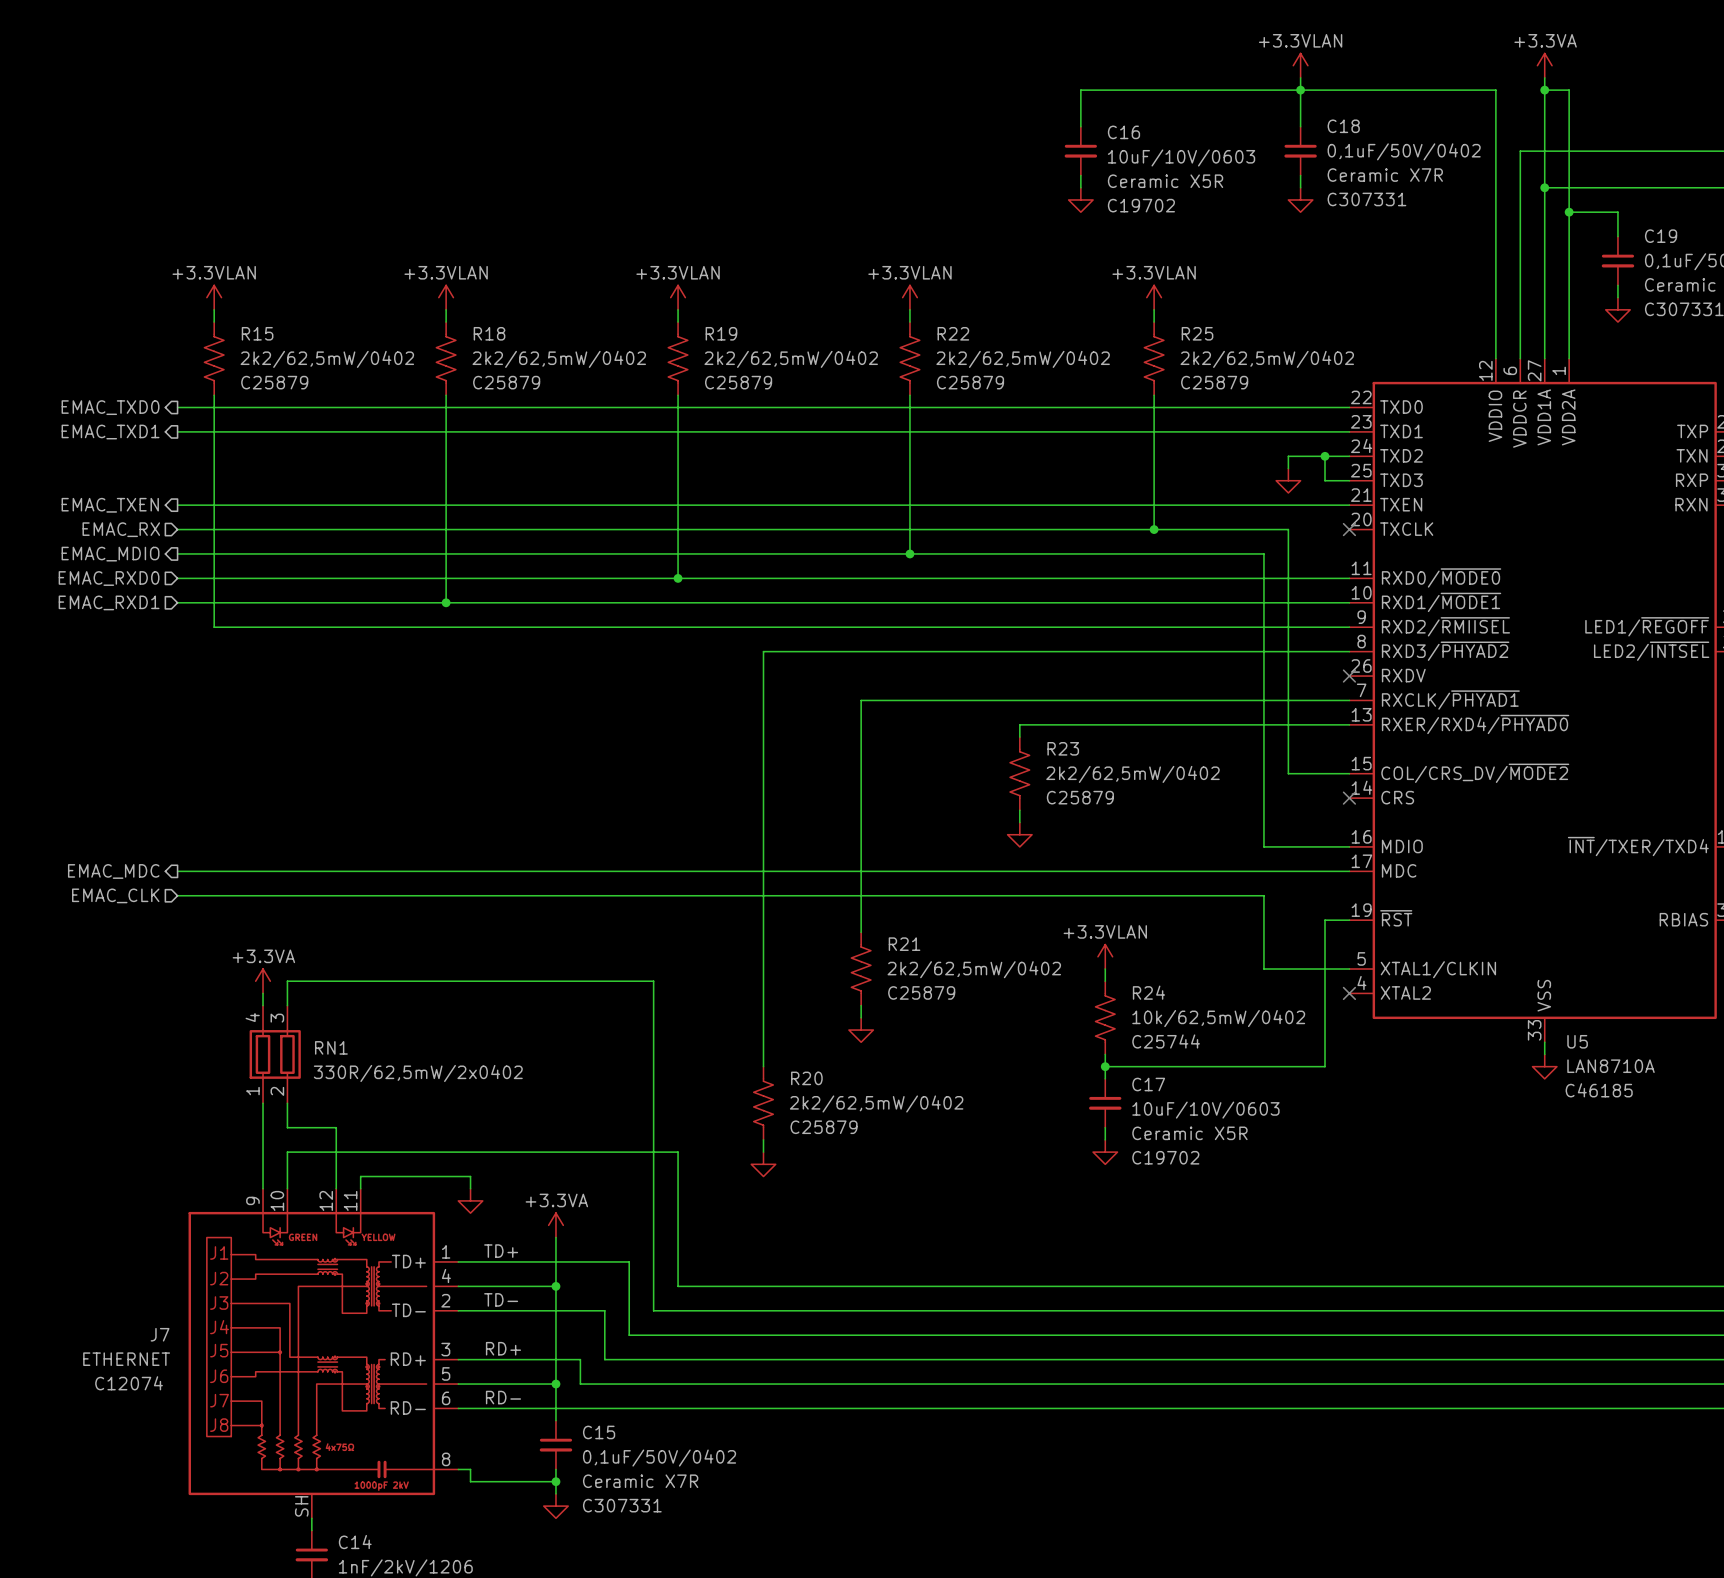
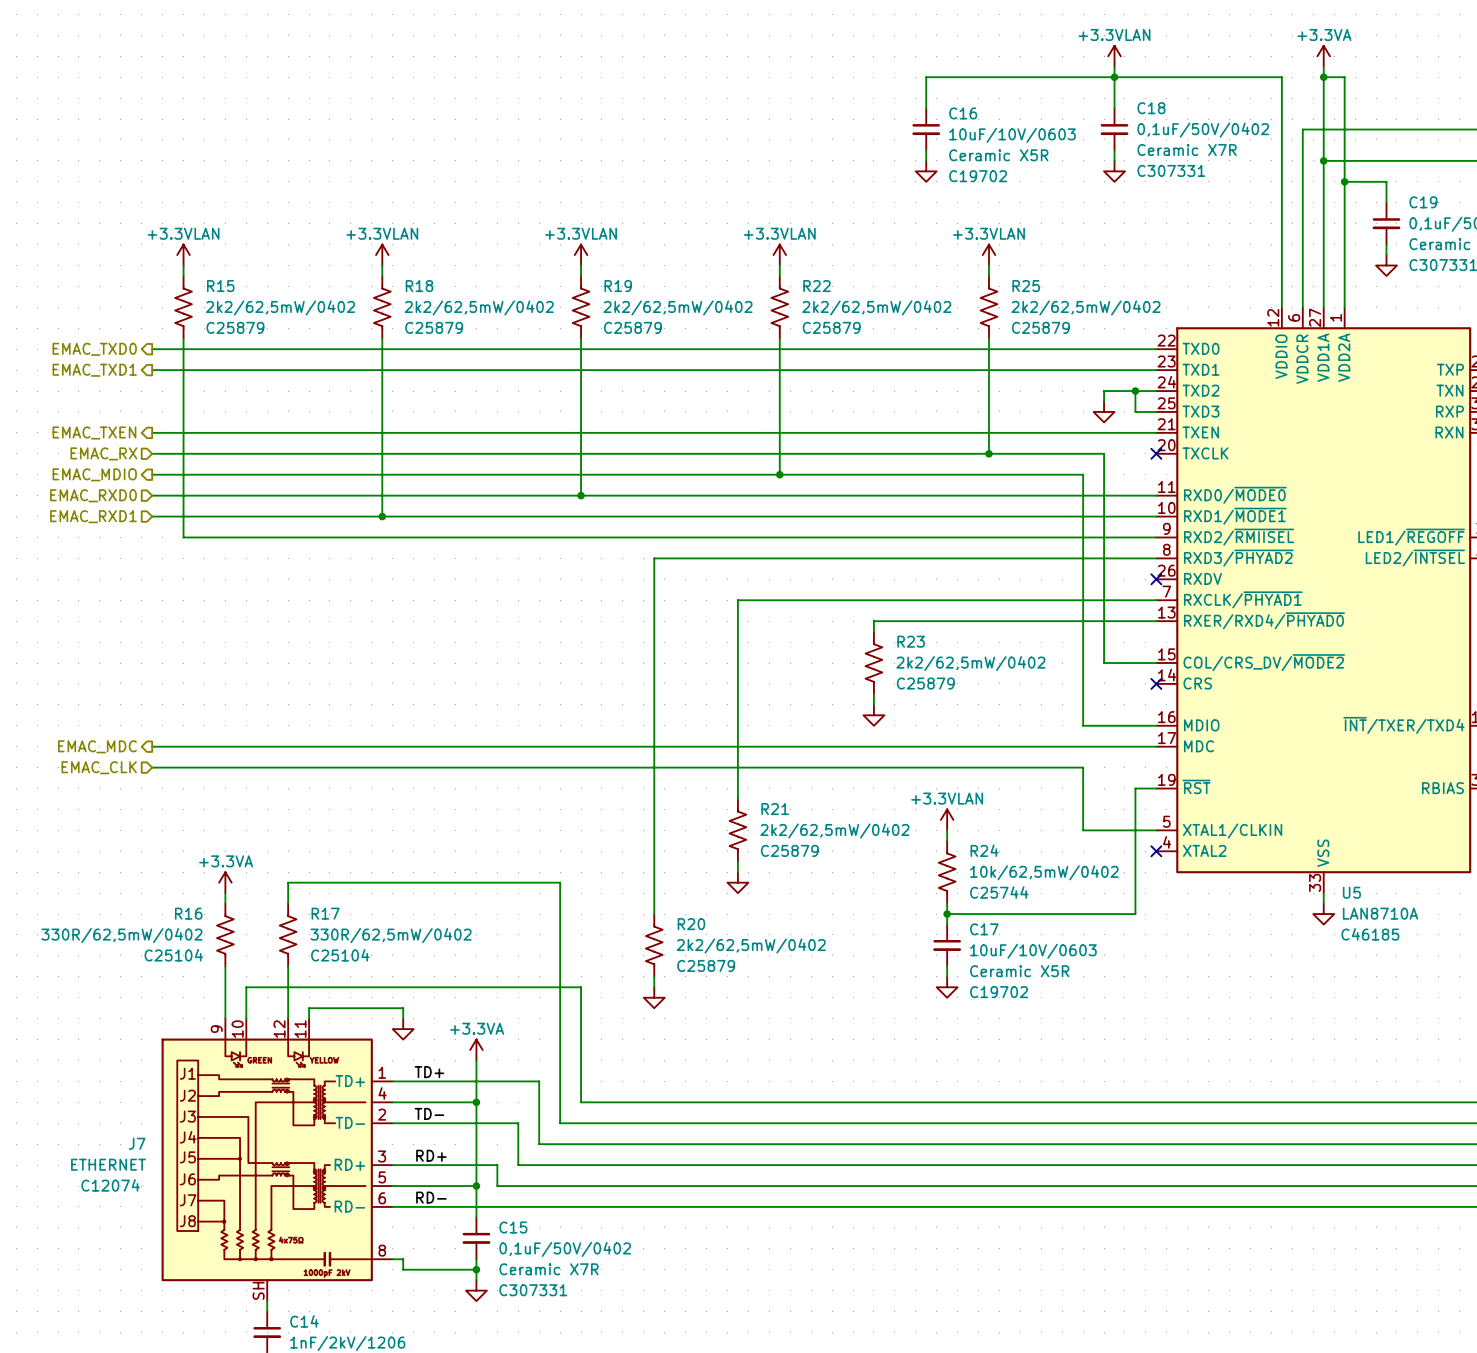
power symbol position: +3.3VA (263, 981) -> +3.3VA (225, 882)
wire: (287, 1005) (287, 981) (653, 981) (653, 1030) -> (288, 903) (288, 882) (560, 882)
RN1: 330R/62,5mW/2x0402 (275, 1054) -> none
R16: none -> 330R/62,5mW/0402 (225, 934)
R17: none -> 330R/62,5mW/0402 (288, 934)
wire: (287, 1103) (287, 1127) (336, 1127) -> none

